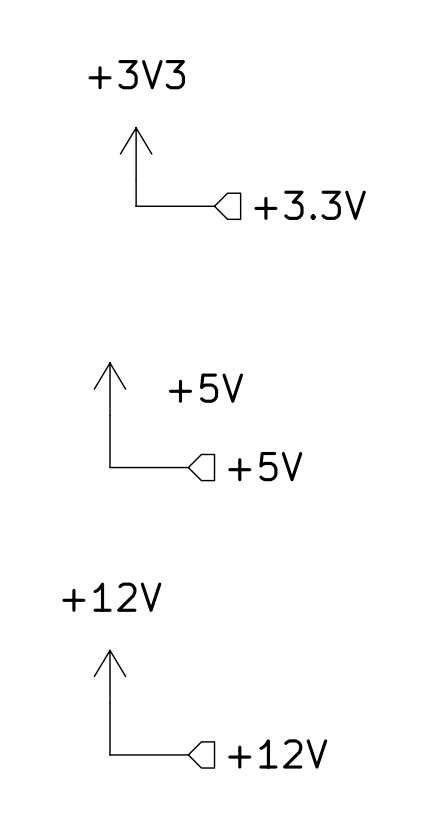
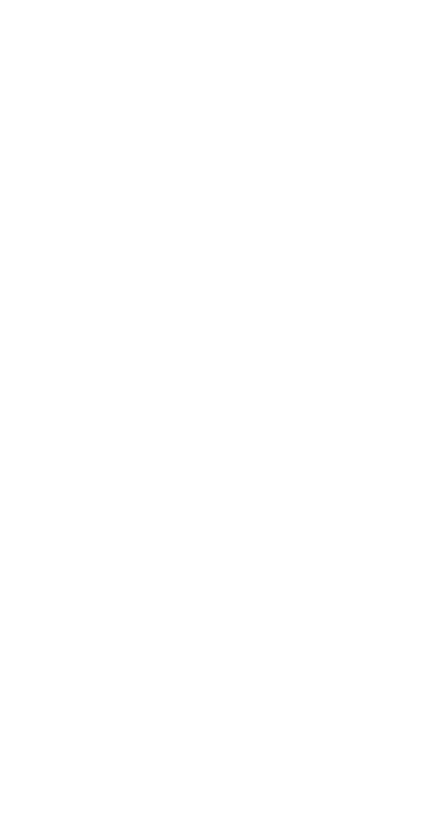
power symbol: +3V3 (136, 154) -> none
wire: (136, 180) (136, 206) (214, 206) -> none
hierarchical label: +3.3V (310, 205) -> none
power symbol: +5V (110, 389) -> none
wire: (110, 415) (110, 467) (188, 467) -> none
hierarchical label: +5V (265, 466) -> none
power symbol: +12V (110, 676) -> none
wire: (110, 702) (110, 754) (188, 754) -> none
hierarchical label: +12V (277, 753) -> none

